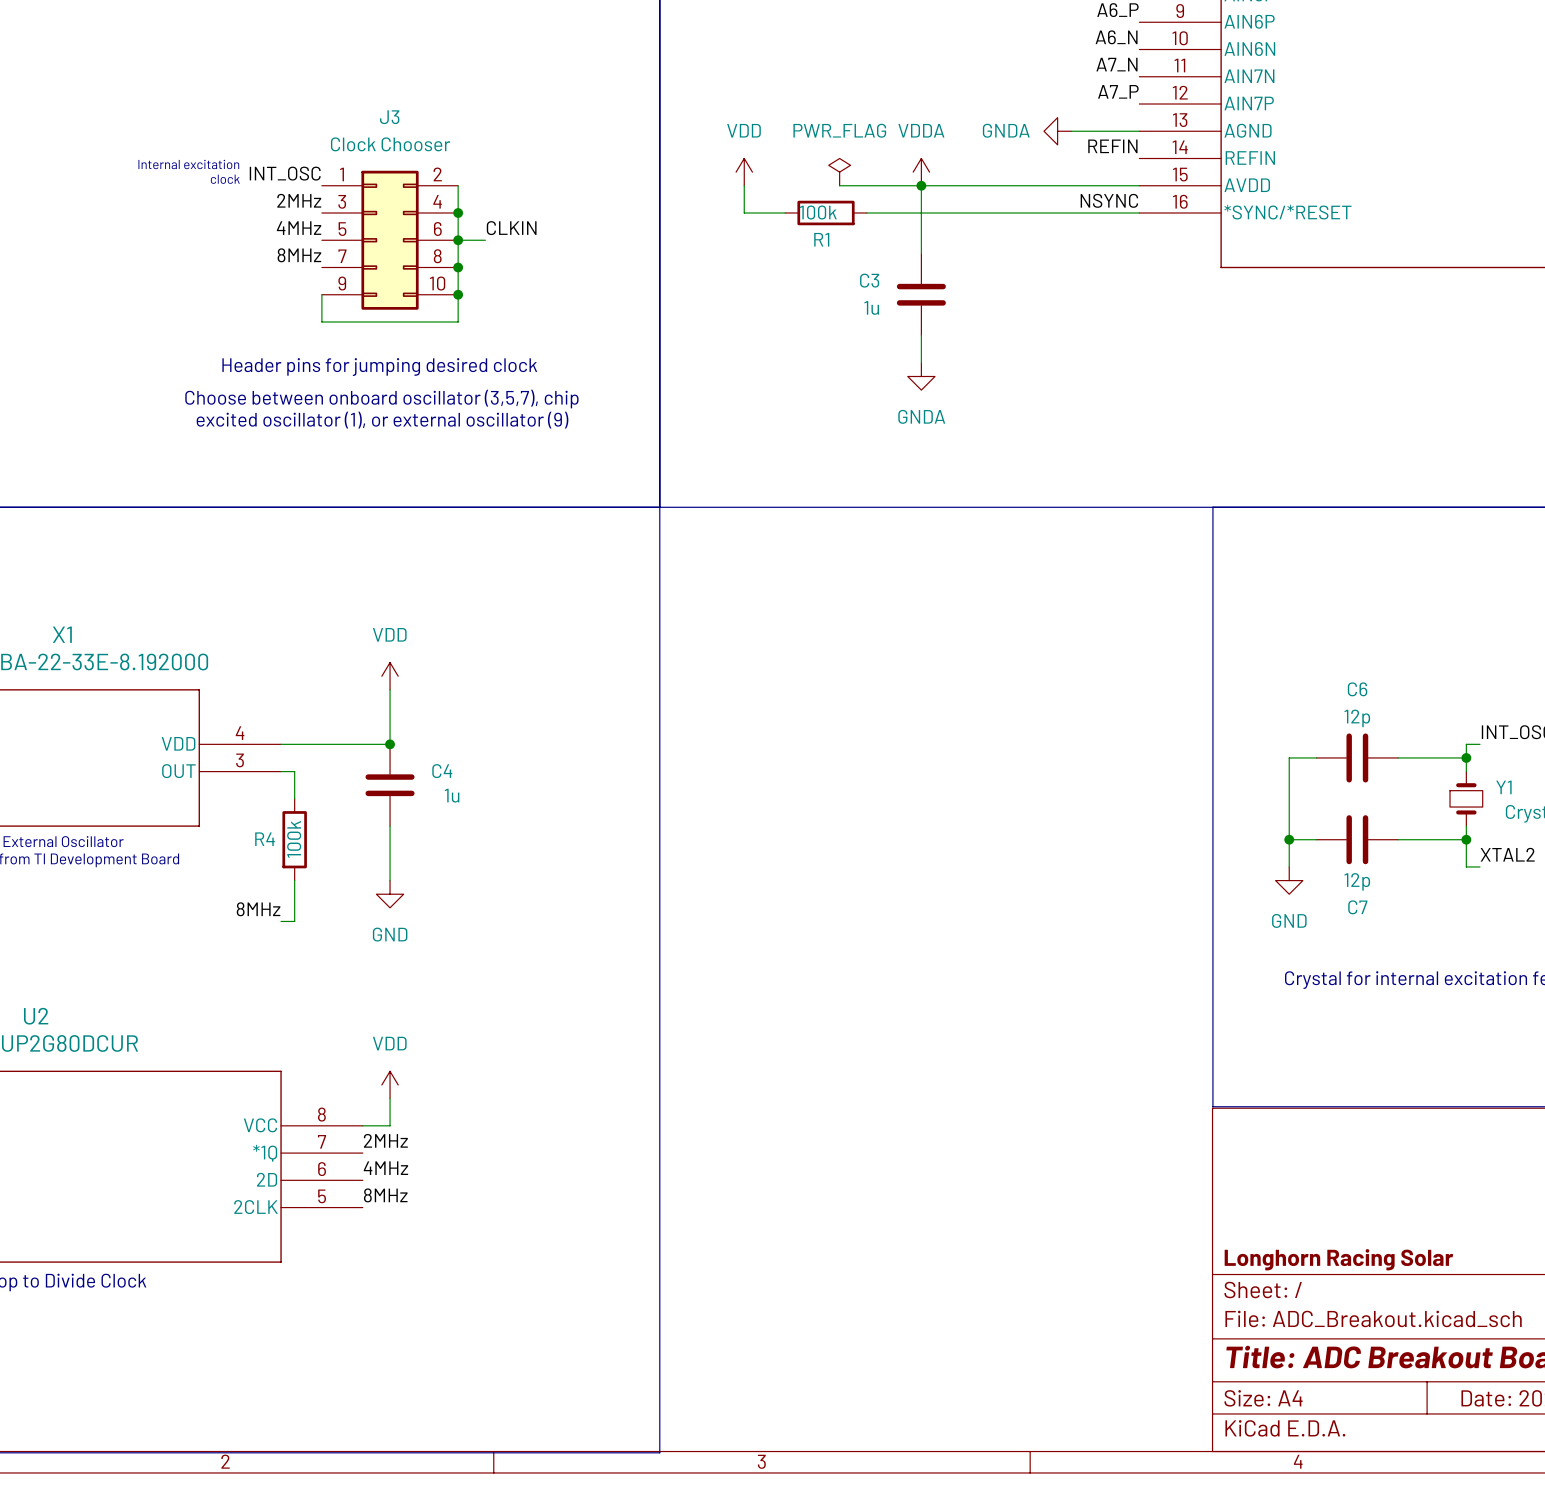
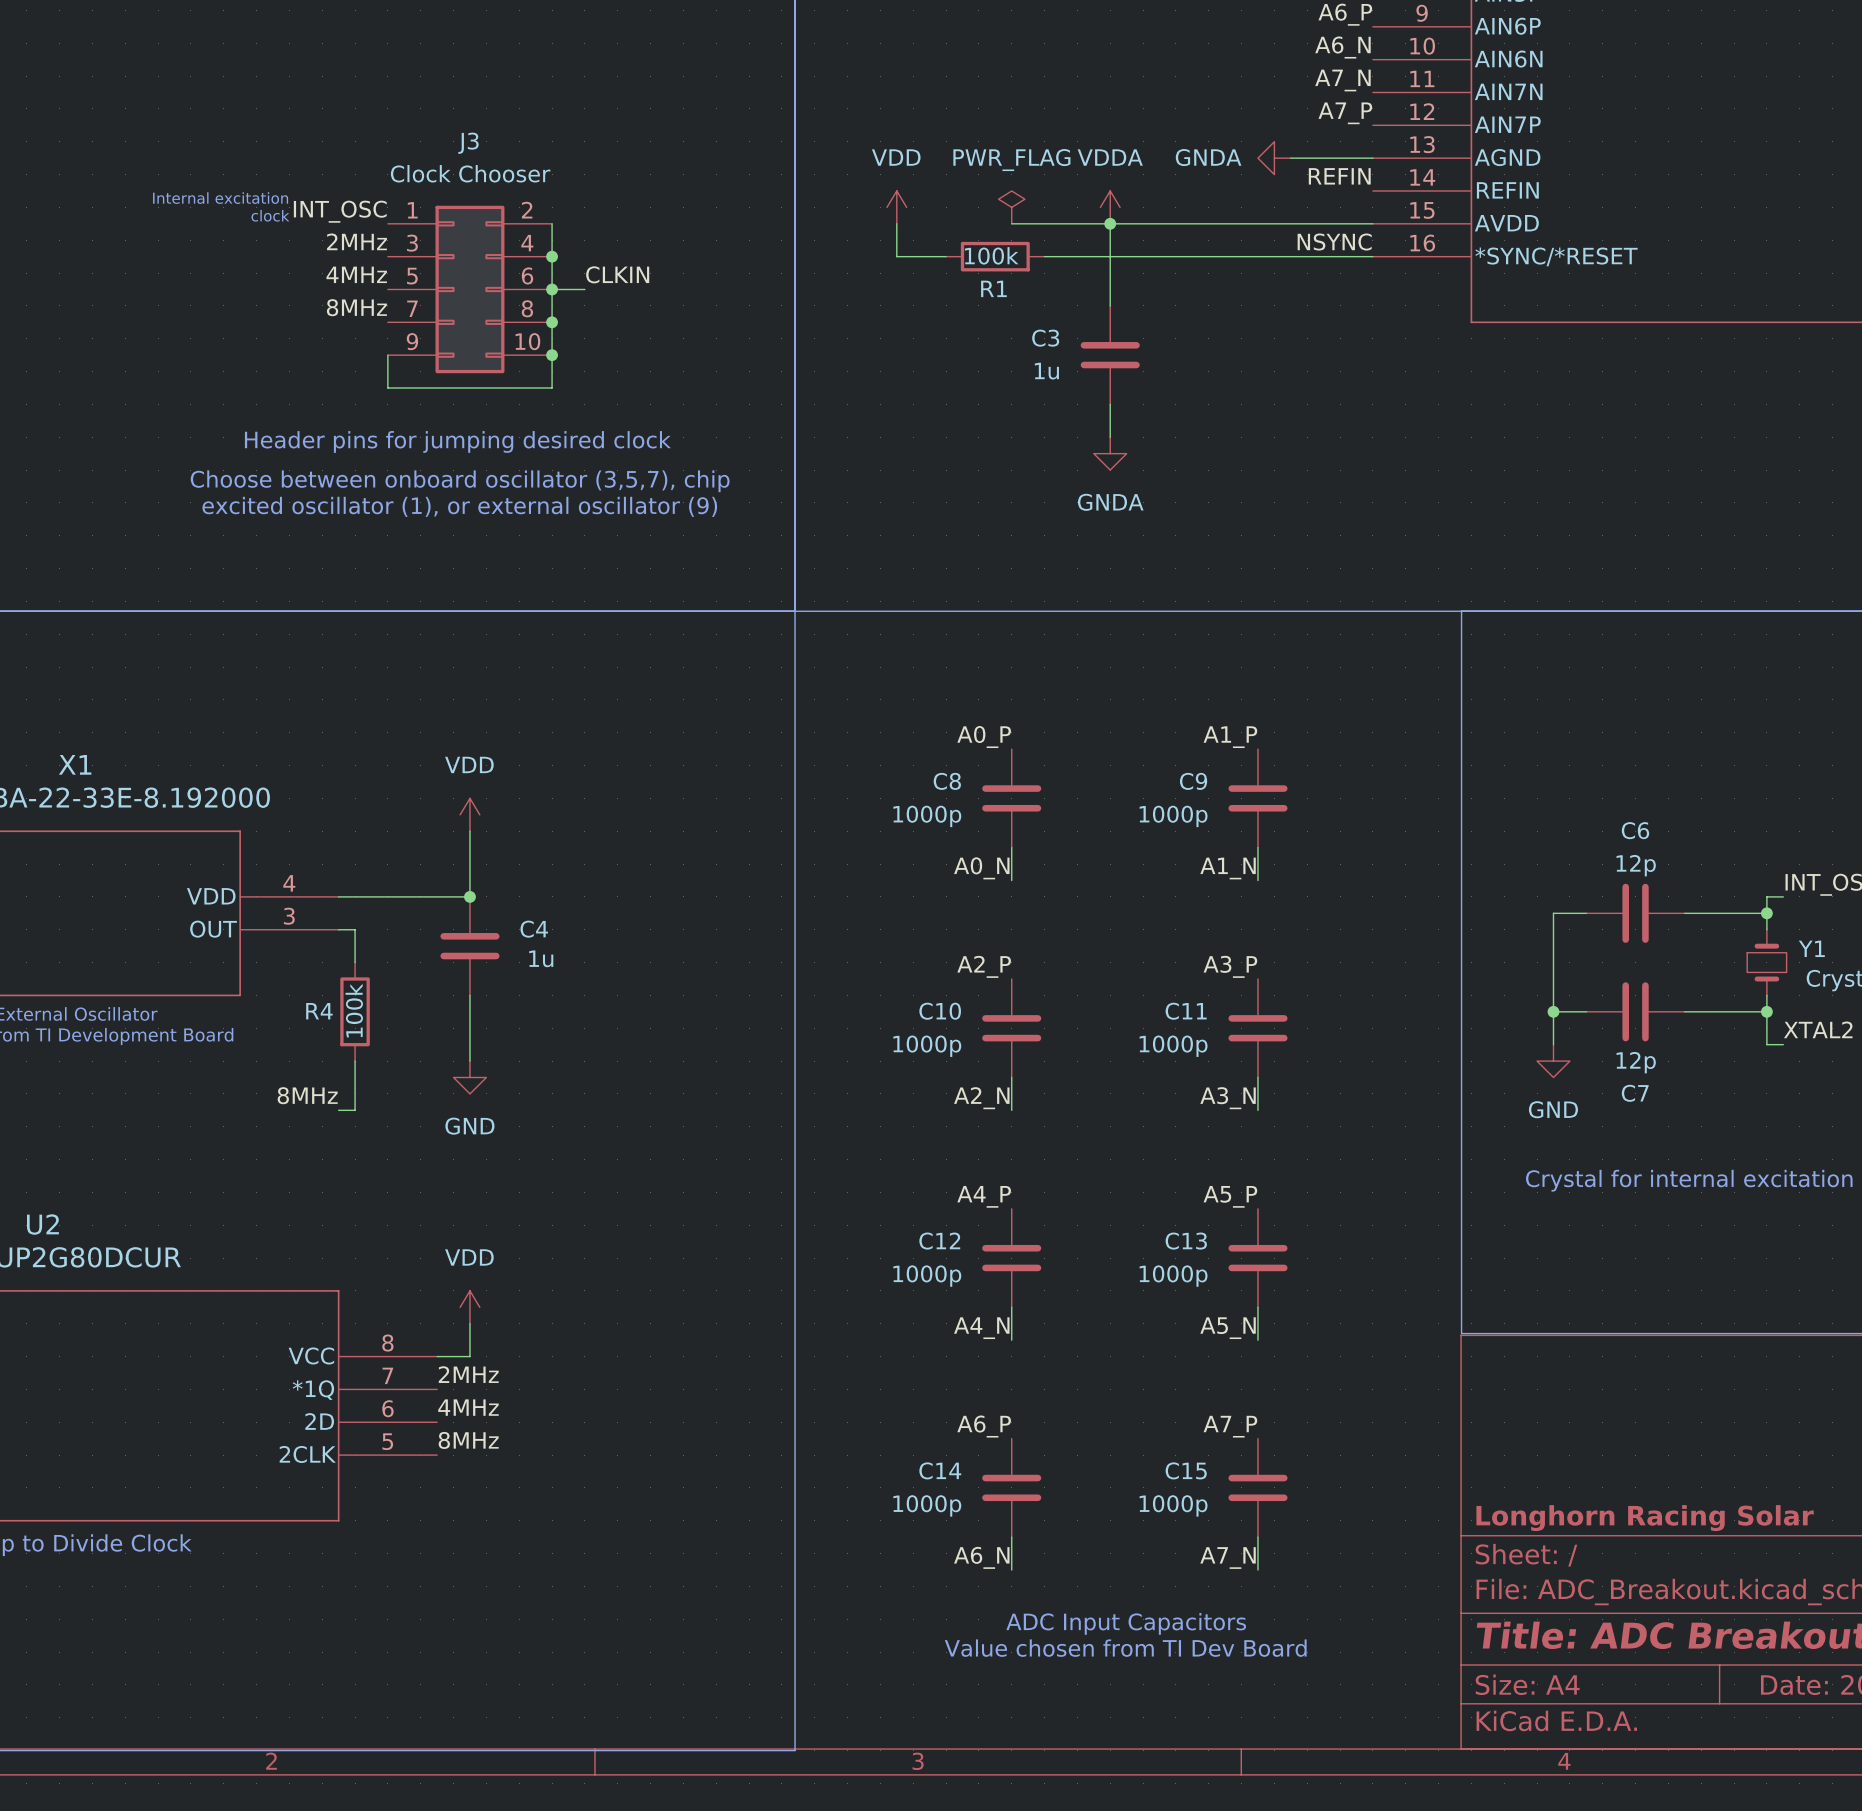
label: none -> A0_P (984, 737)
label: none -> A1_P (1230, 737)
C8: none -> 1000p (1011, 798)
C9: none -> 1000p (1257, 798)
wire: none -> (1011, 847) (1011, 880)
wire: none -> (1257, 847) (1257, 880)
label: none -> A0_N (981, 868)
label: none -> A1_N (1228, 868)
label: none -> A2_P (984, 966)
label: none -> A3_P (1230, 966)
C10: none -> 1000p (1011, 1028)
C11: none -> 1000p (1257, 1028)
wire: none -> (1011, 1077) (1011, 1110)
wire: none -> (1257, 1077) (1257, 1110)
label: none -> A2_N (981, 1098)
label: none -> A3_N (1228, 1098)
label: none -> A4_P (984, 1196)
label: none -> A5_P (1230, 1196)
C12: none -> 1000p (1011, 1258)
C13: none -> 1000p (1257, 1258)
wire: none -> (1011, 1307) (1011, 1340)
wire: none -> (1257, 1307) (1257, 1340)
label: none -> A4_N (981, 1328)
label: none -> A5_N (1228, 1328)
label: none -> A6_P (984, 1426)
label: none -> A7_P (1230, 1426)
C14: none -> 1000p (1011, 1487)
C15: none -> 1000p (1257, 1487)
wire: none -> (1011, 1537) (1011, 1570)
wire: none -> (1257, 1537) (1257, 1570)
label: none -> A6_N (981, 1557)
label: none -> A7_N (1228, 1558)
text: none -> ADC Input Capacitors (1126, 1623)
text: none -> Value chosen from TI Dev Board (1125, 1648)

